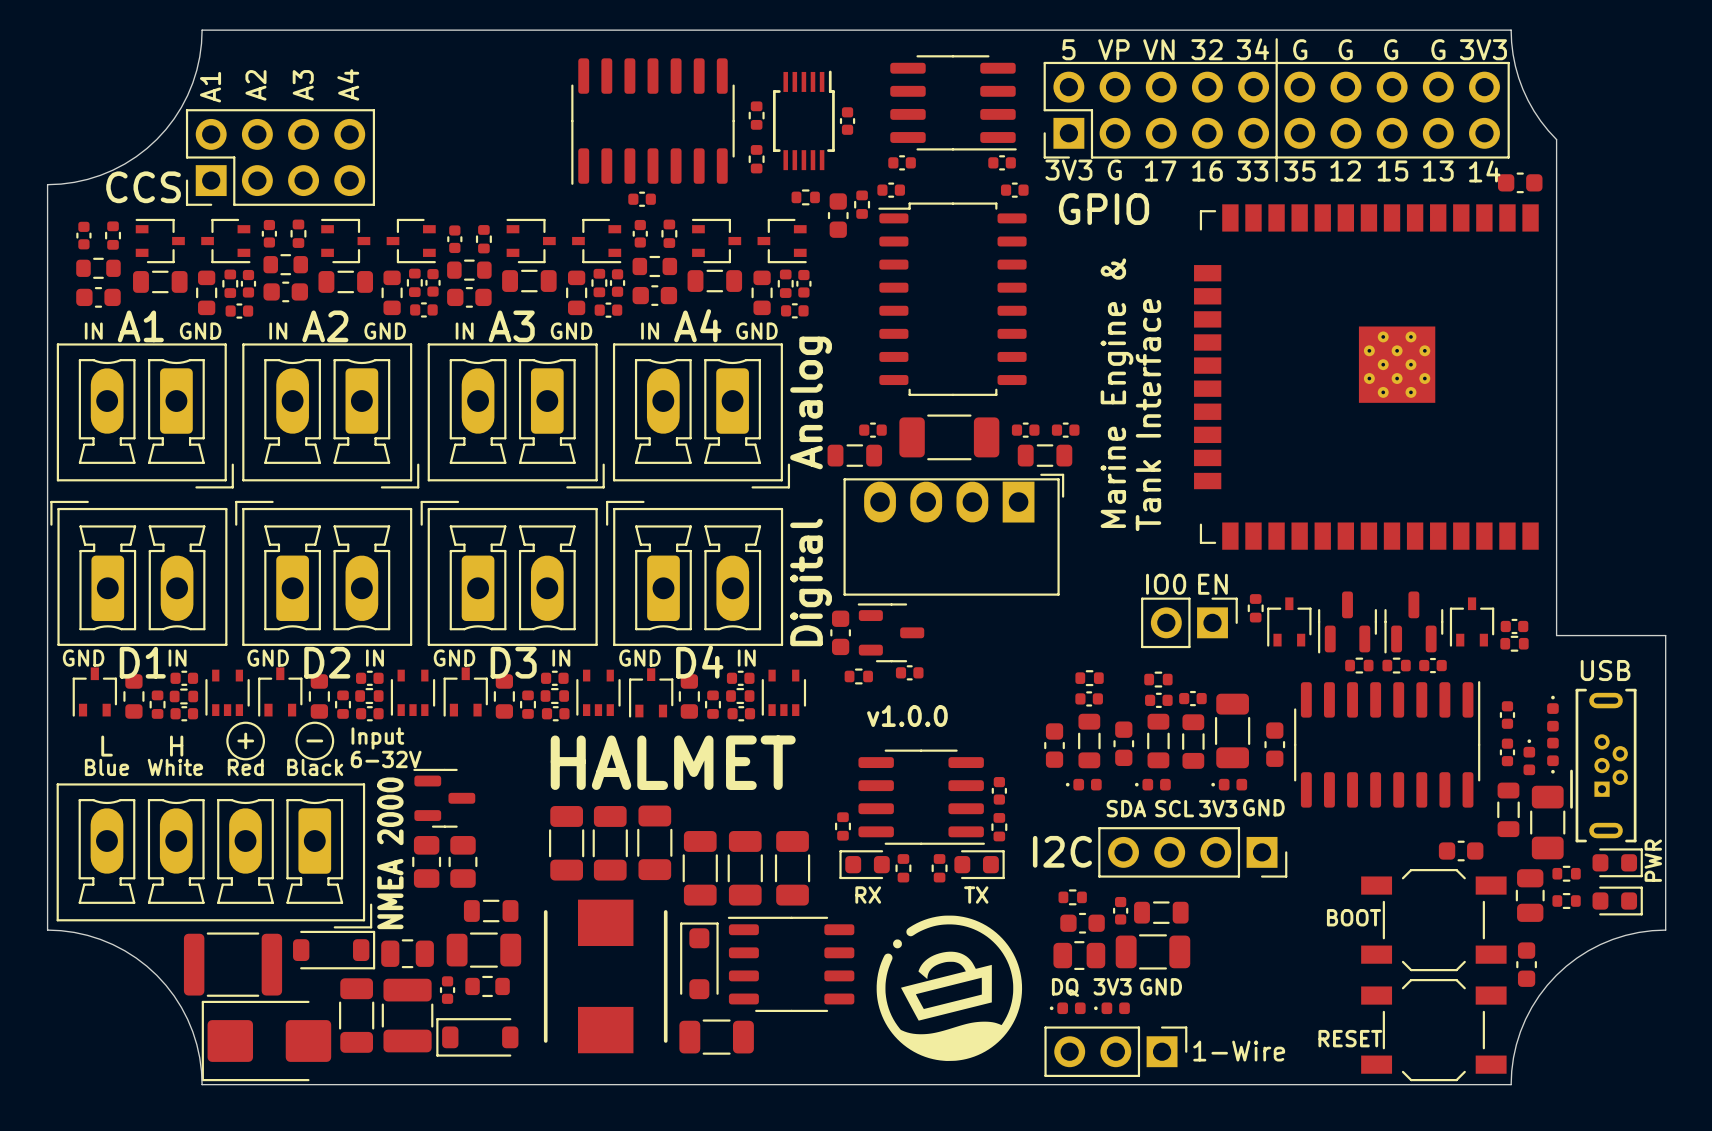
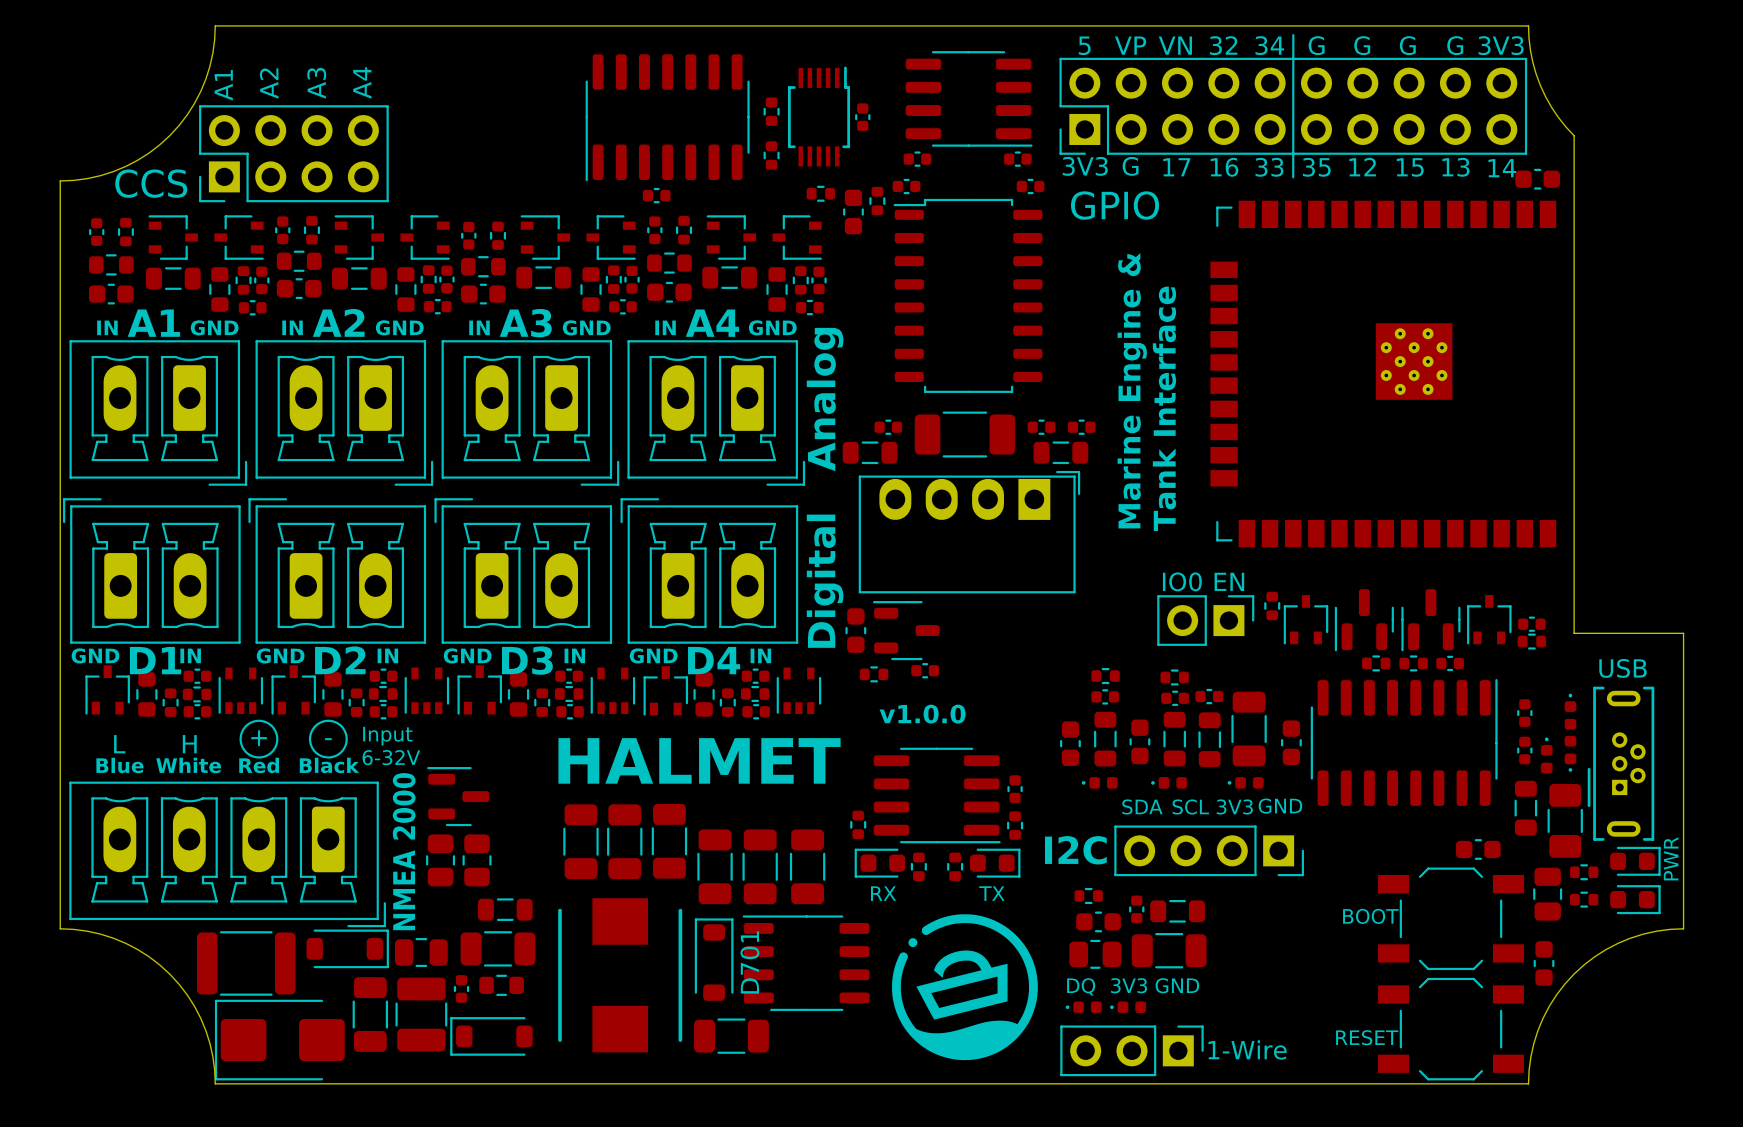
part: (699, 960) -> none
D701: none -> (714, 959)

